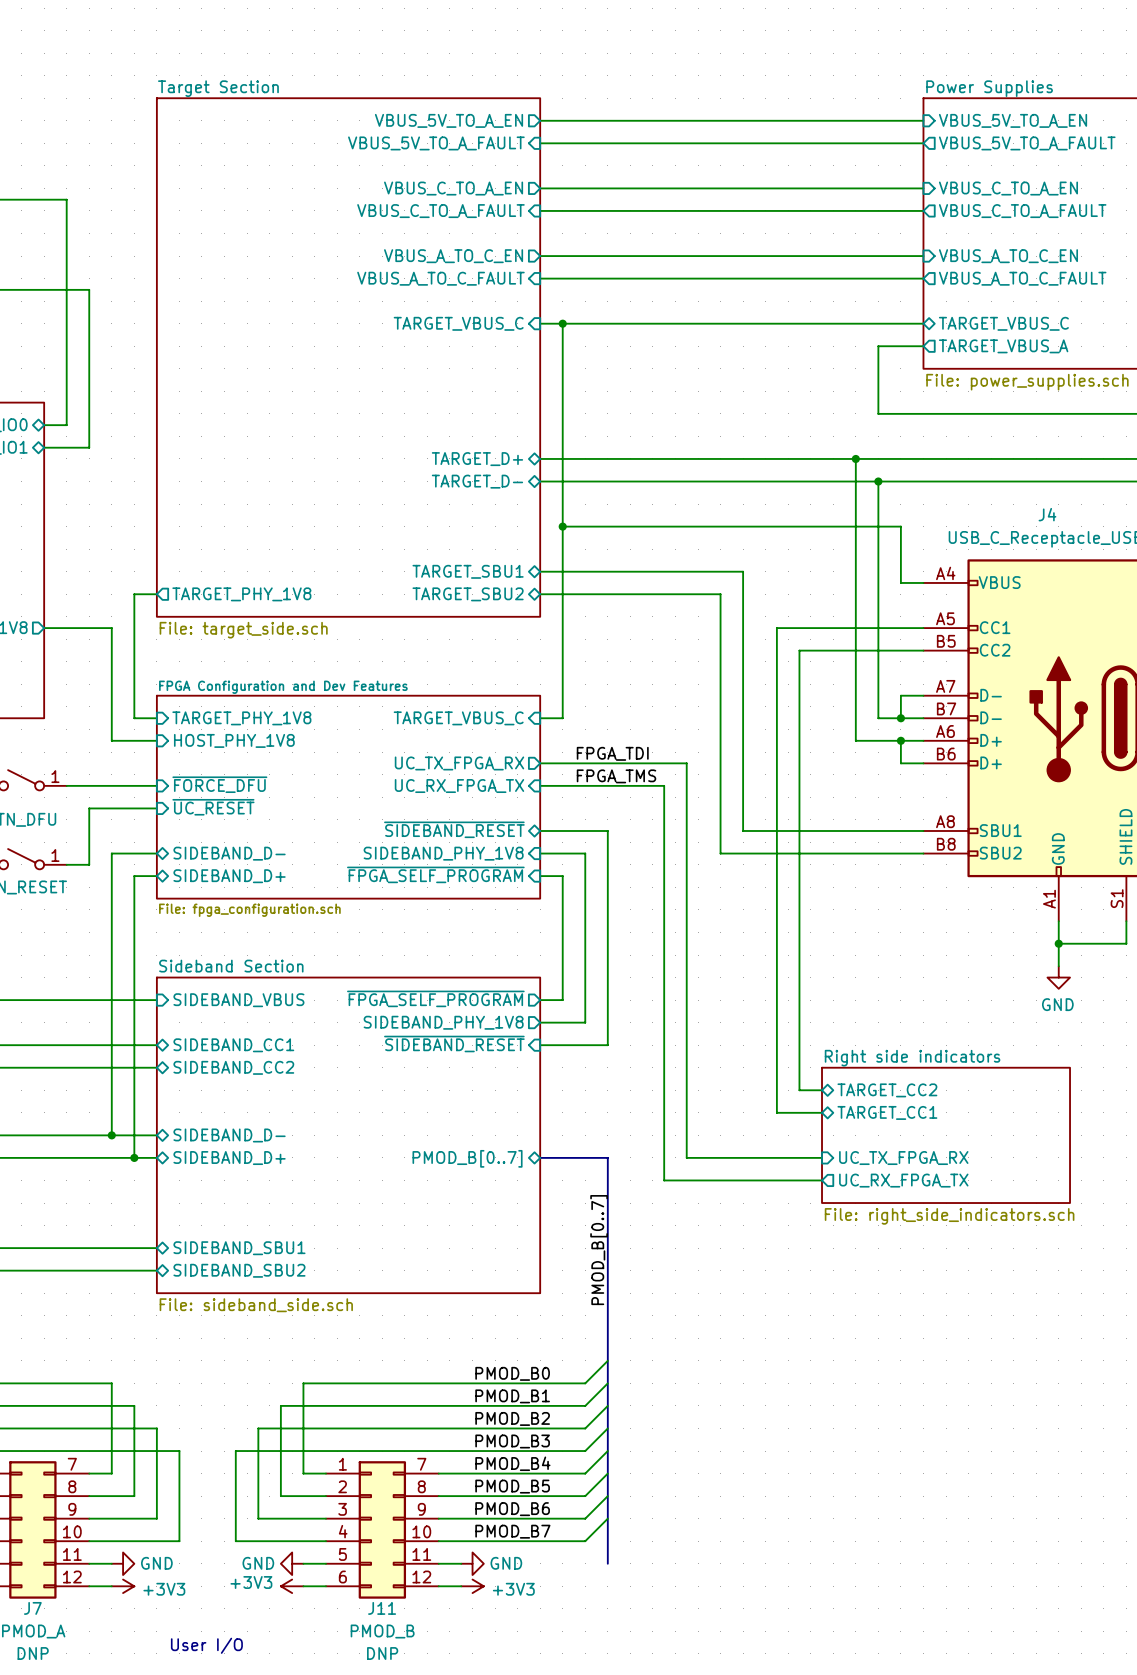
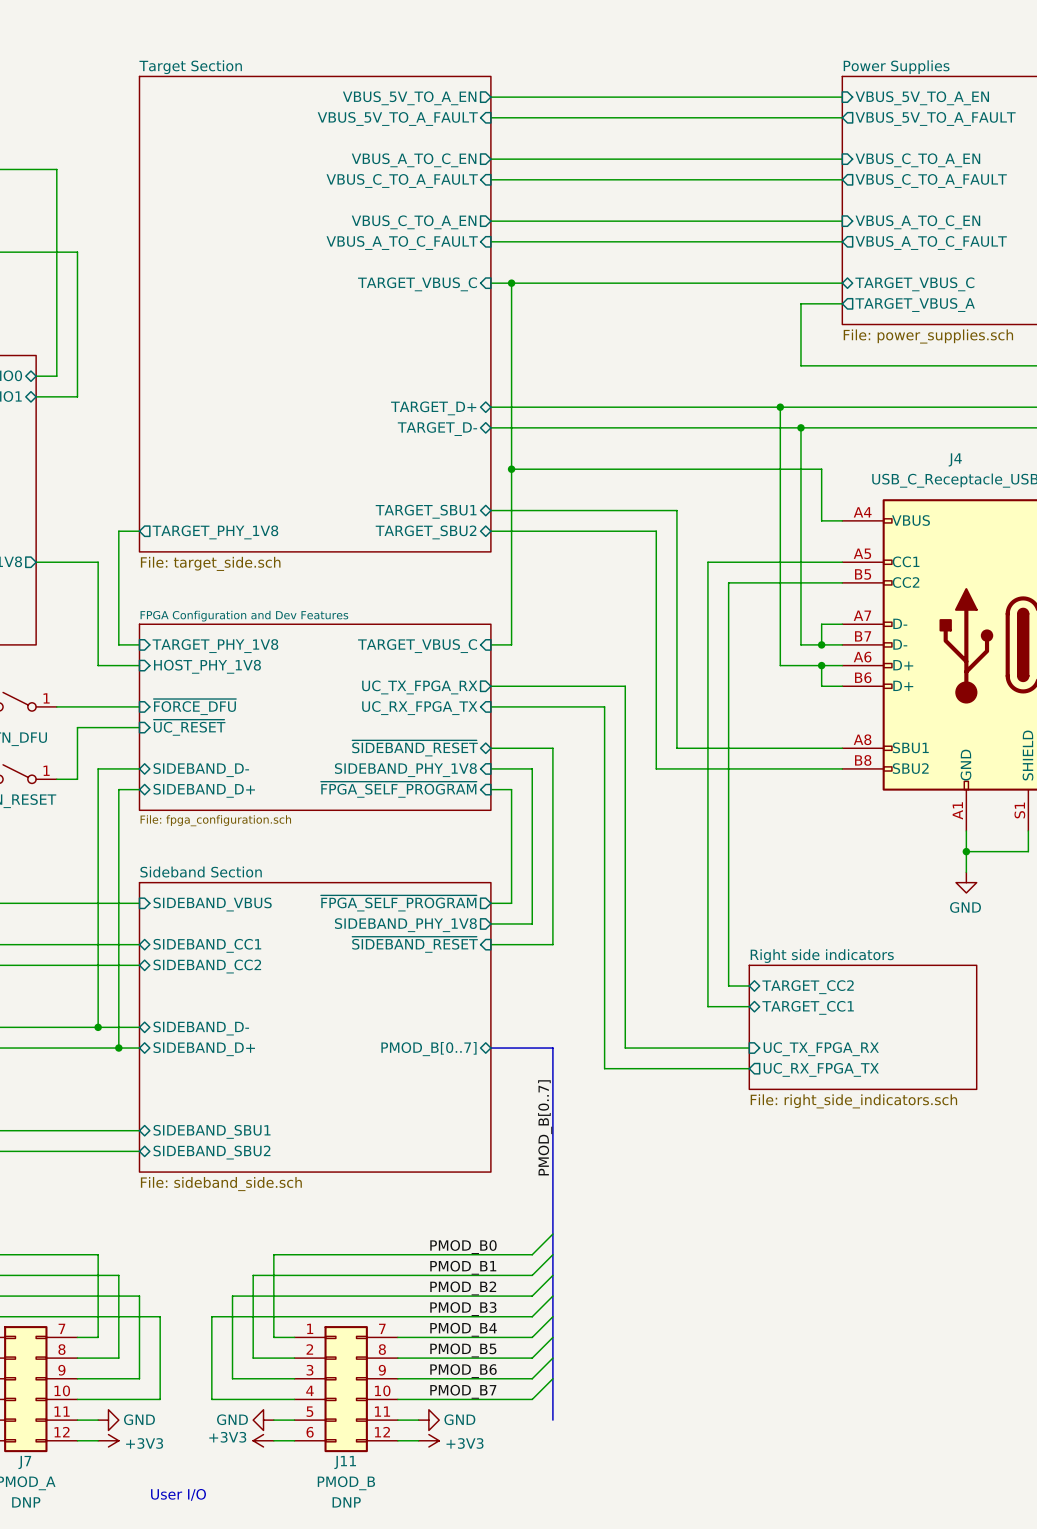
sheet pin: VBUS_C_TO_A_EN (453, 188) -> VBUS_A_TO_C_EN (414, 160)
sheet pin: VBUS_A_TO_C_EN (453, 256) -> VBUS_C_TO_A_EN (414, 222)
label: FPGA_TDI (612, 753) -> none
label: FPGA_TMS (616, 776) -> none

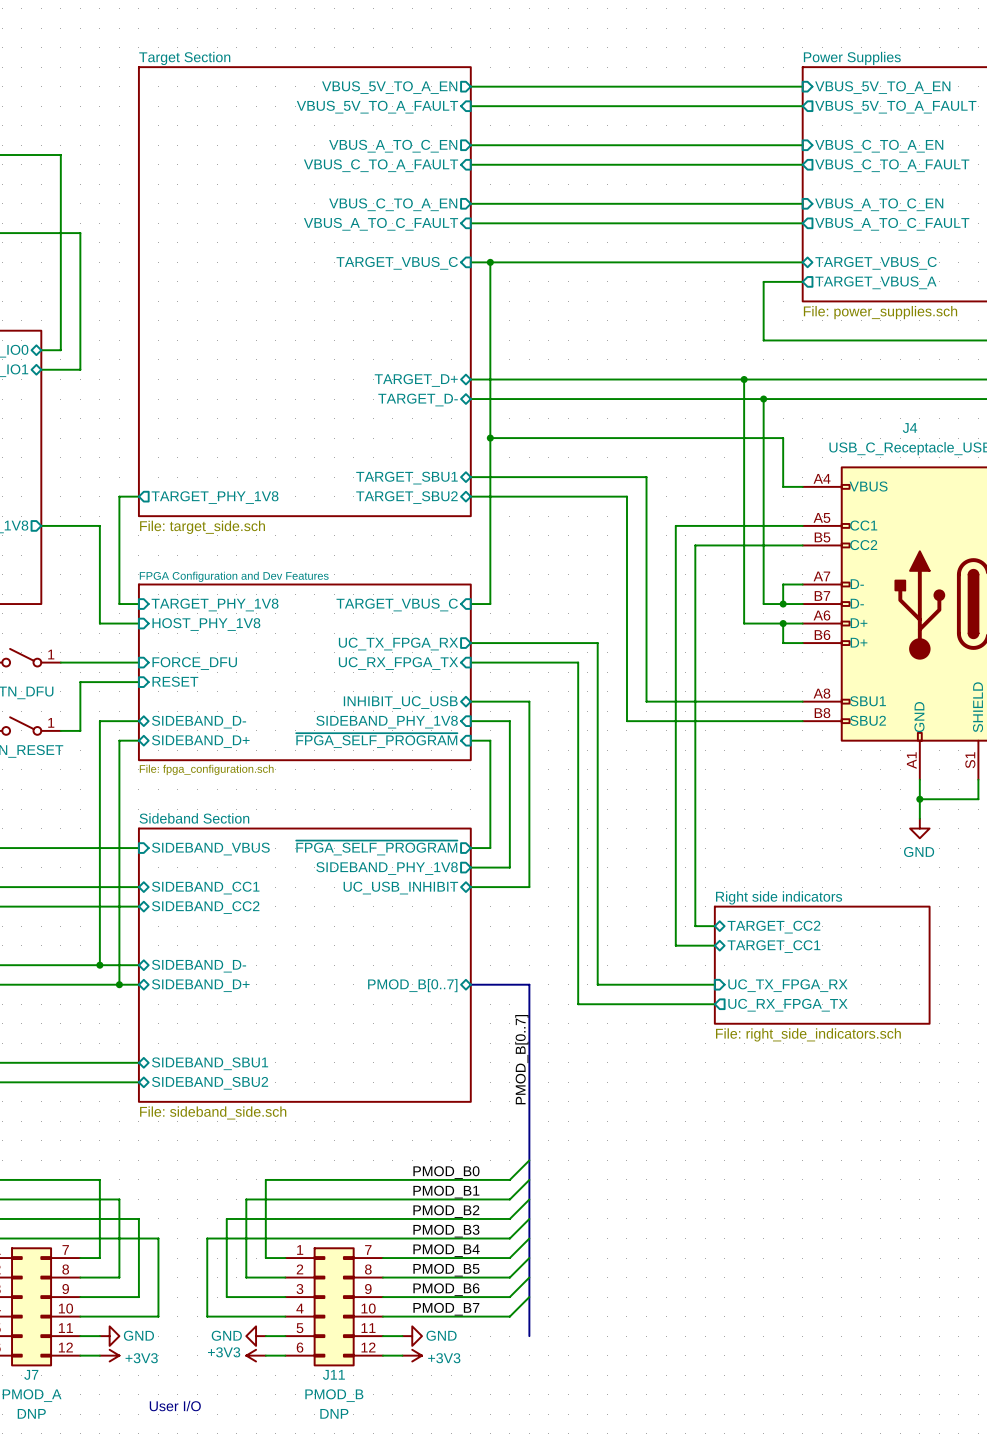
sheet pin: ~{FORCE_DFU} (194, 707) -> FORCE_DFU (194, 663)
sheet pin: ~{UC_RESET} (189, 727) -> RESET (175, 681)
sheet pin: ~{SIDEBAND_RESET} (415, 748) -> INHIBIT_UC_USB (400, 702)
sheet pin shape: input (415, 944) -> bidirectional (400, 888)
sheet pin: ~{SIDEBAND_RESET} (415, 944) -> UC_USB_INHIBIT (400, 888)

